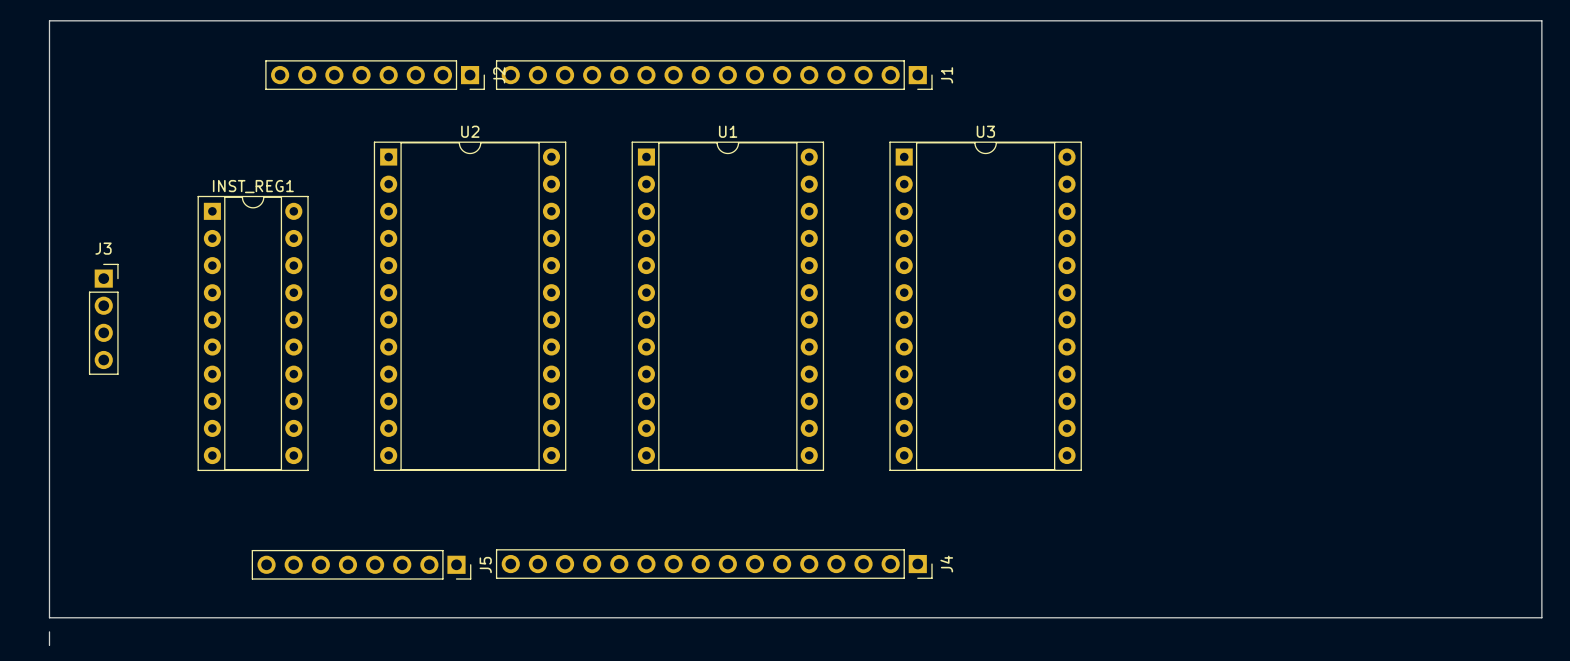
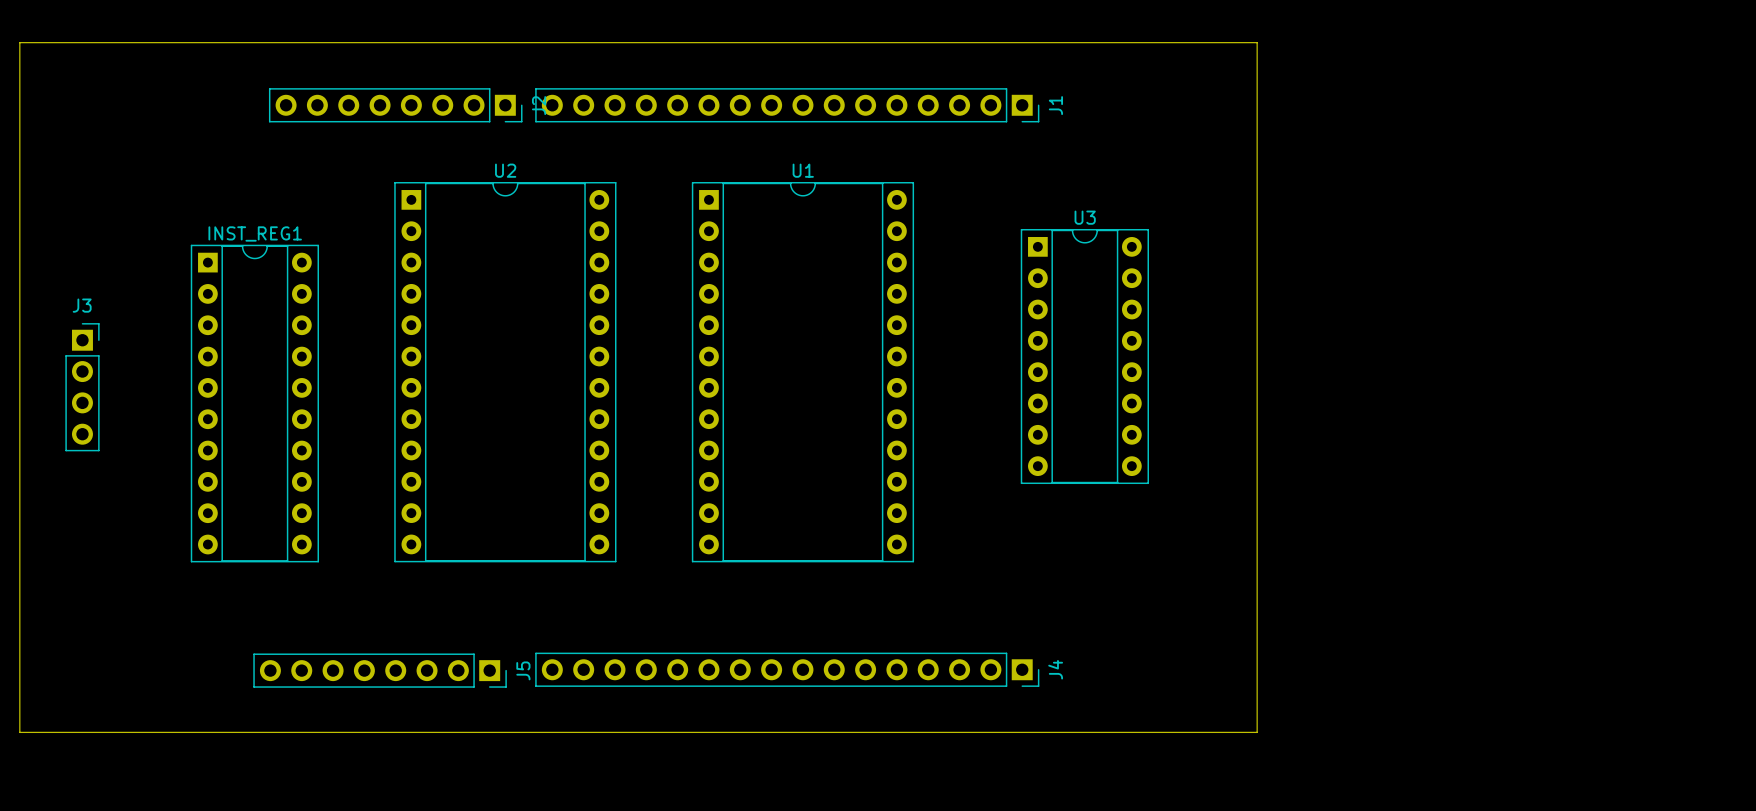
board edge: (1121, 20) (1541, 20) (1541, 617) (49, 617) -> (1257, 42) (1257, 732) (19, 731)
U3 name position: U3 (985, 131) -> U3 (1085, 217)
U3 footprint: [889, 141, 1082, 472] -> [1020, 228, 1150, 485]
board edge: (49, 631) (49, 645) -> none

